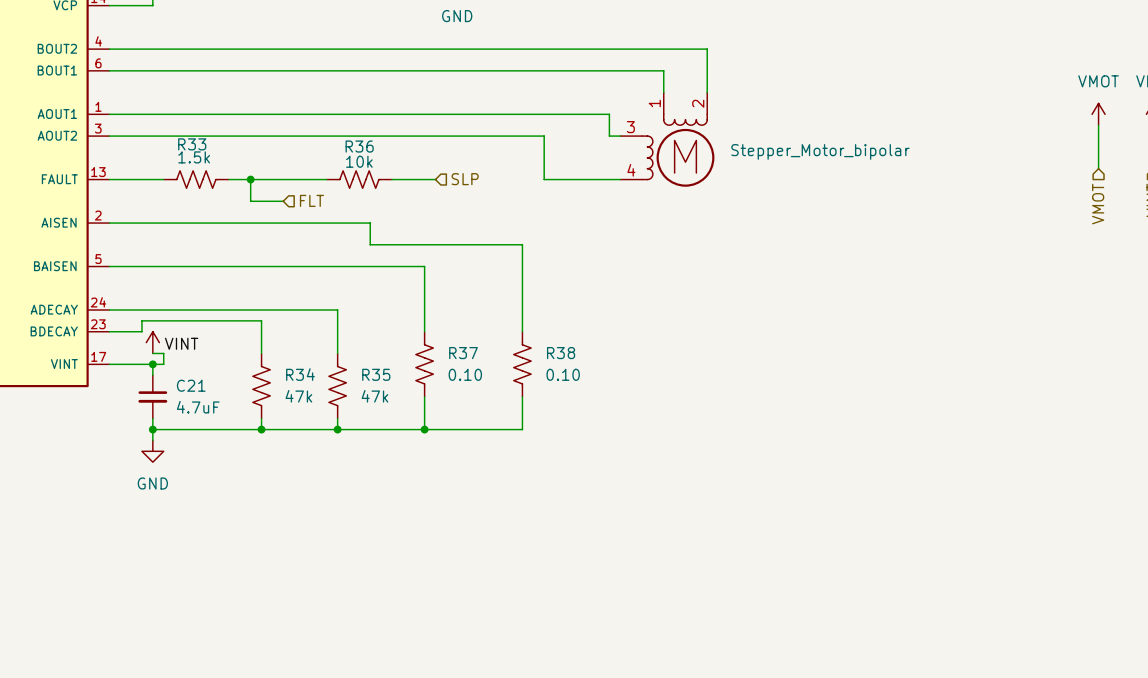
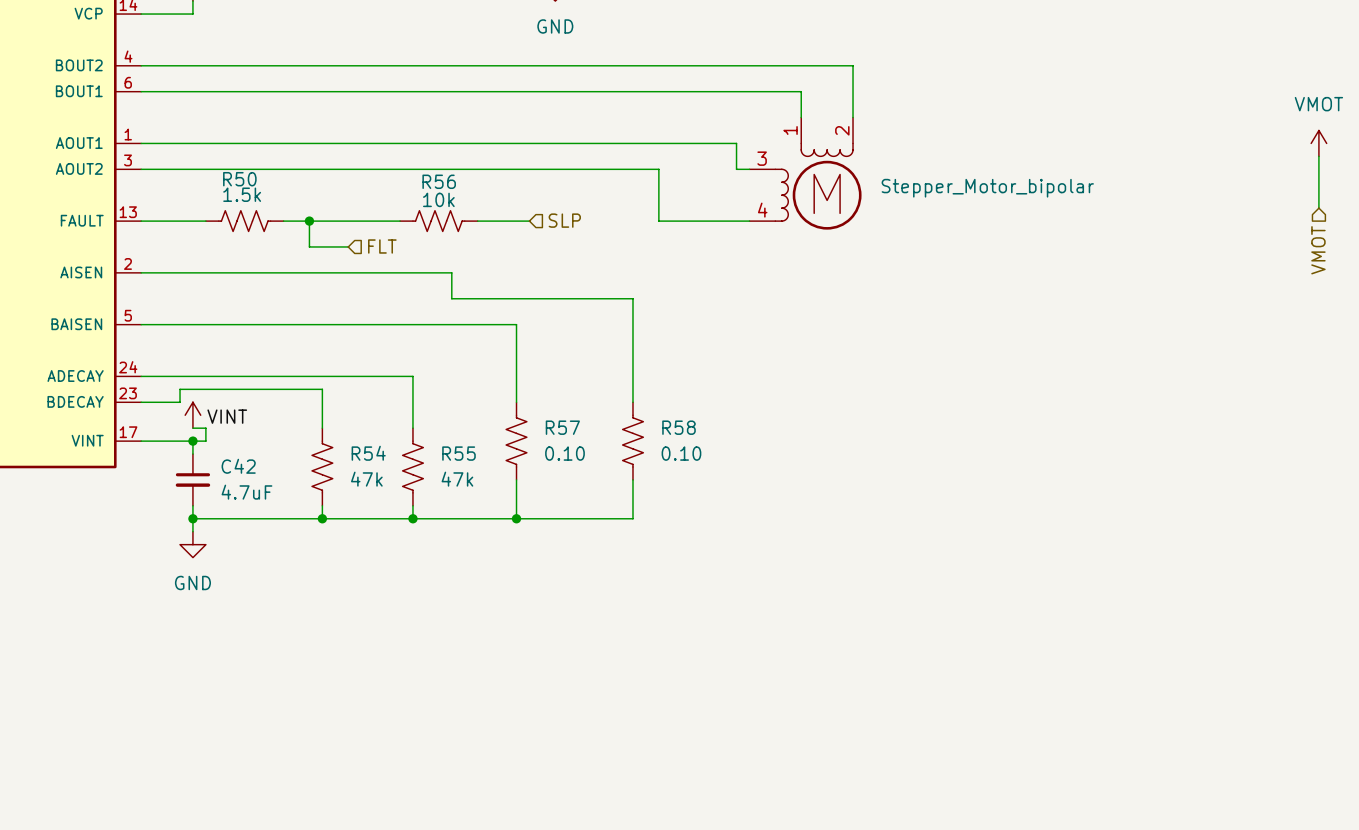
R33 name: R33 (192, 144) -> R50 (239, 179)
R36 name: R36 (359, 146) -> R56 (439, 181)
R37 name: R37 (463, 353) -> R57 (562, 427)
R38 name: R38 (561, 353) -> R58 (679, 427)
R34 name: R34 (300, 374) -> R54 (368, 453)
R35 name: R35 (376, 374) -> R55 (458, 453)
C21 name: C21 (191, 385) -> C42 (238, 466)

